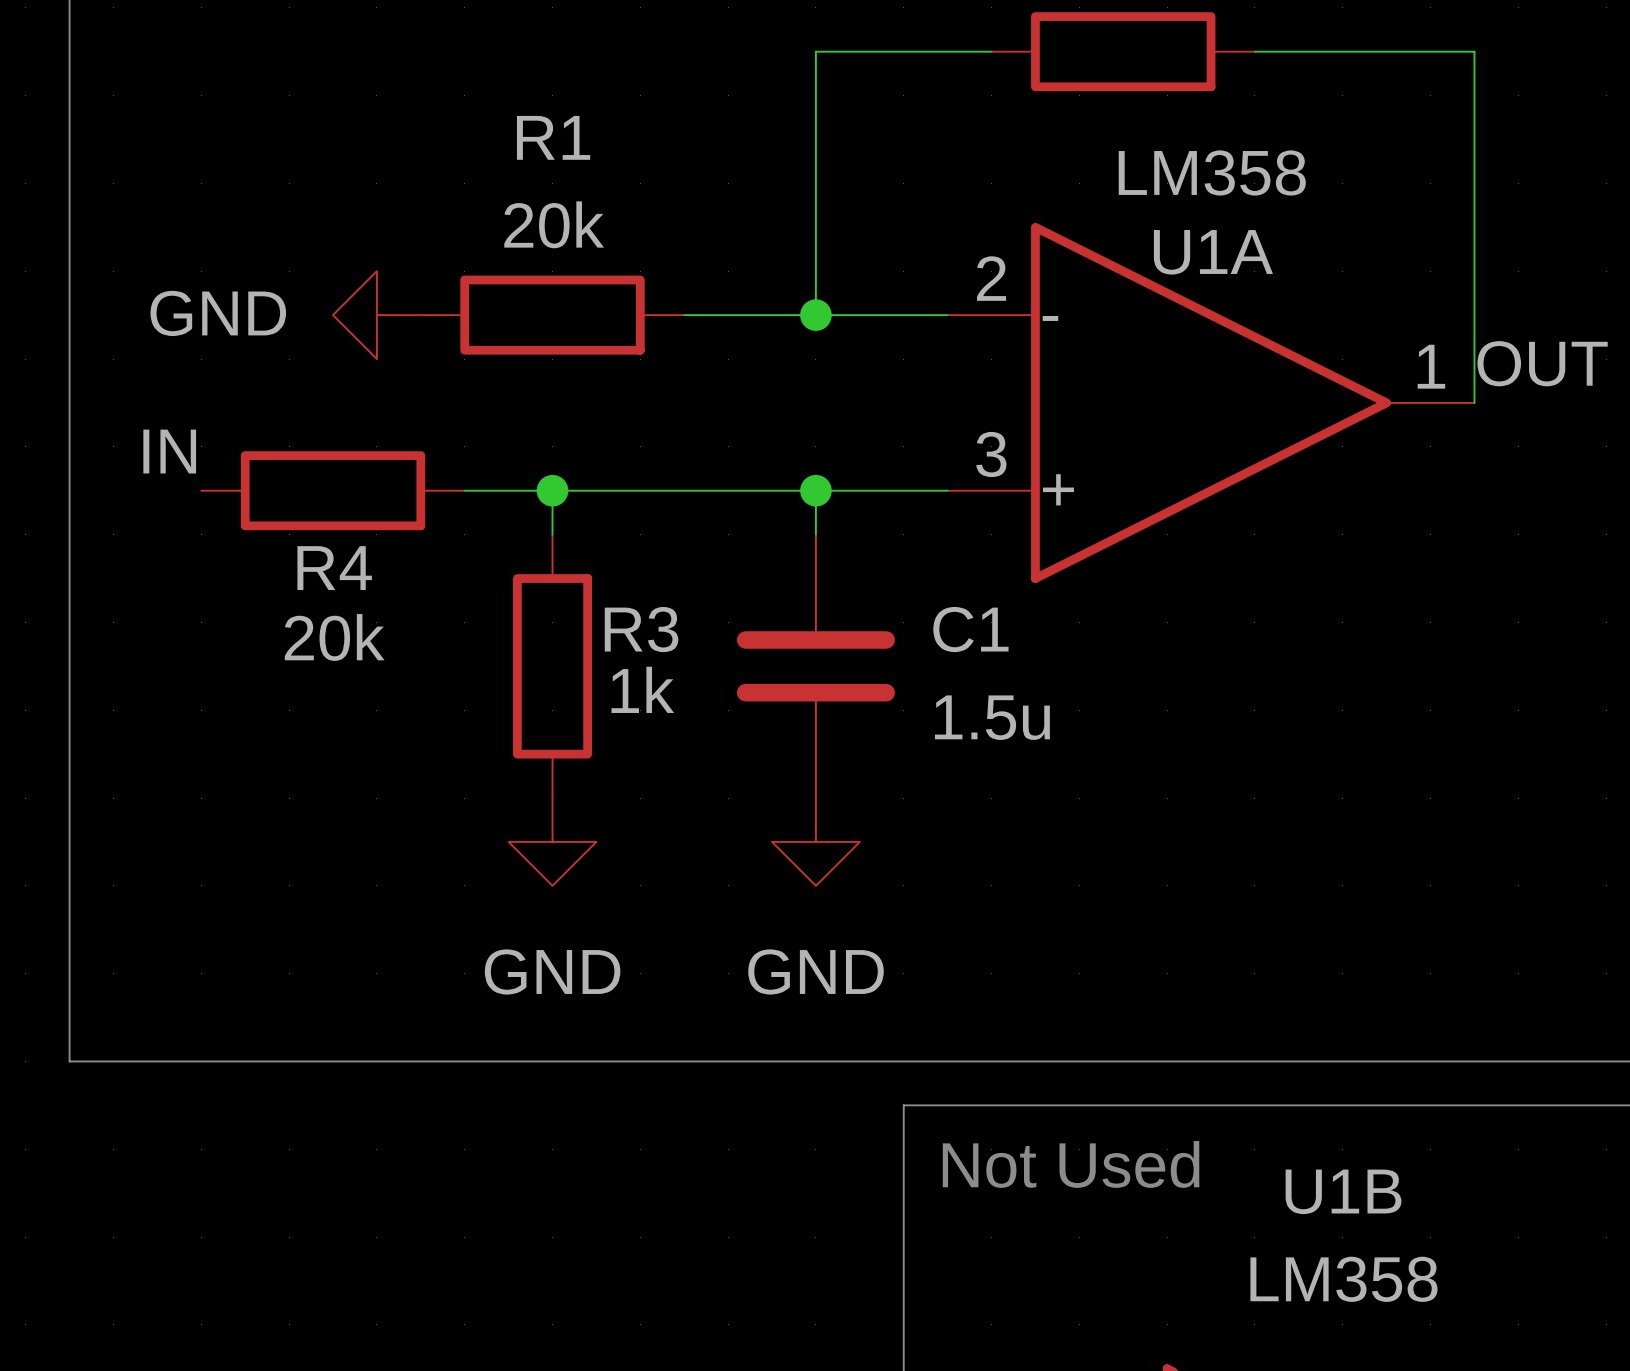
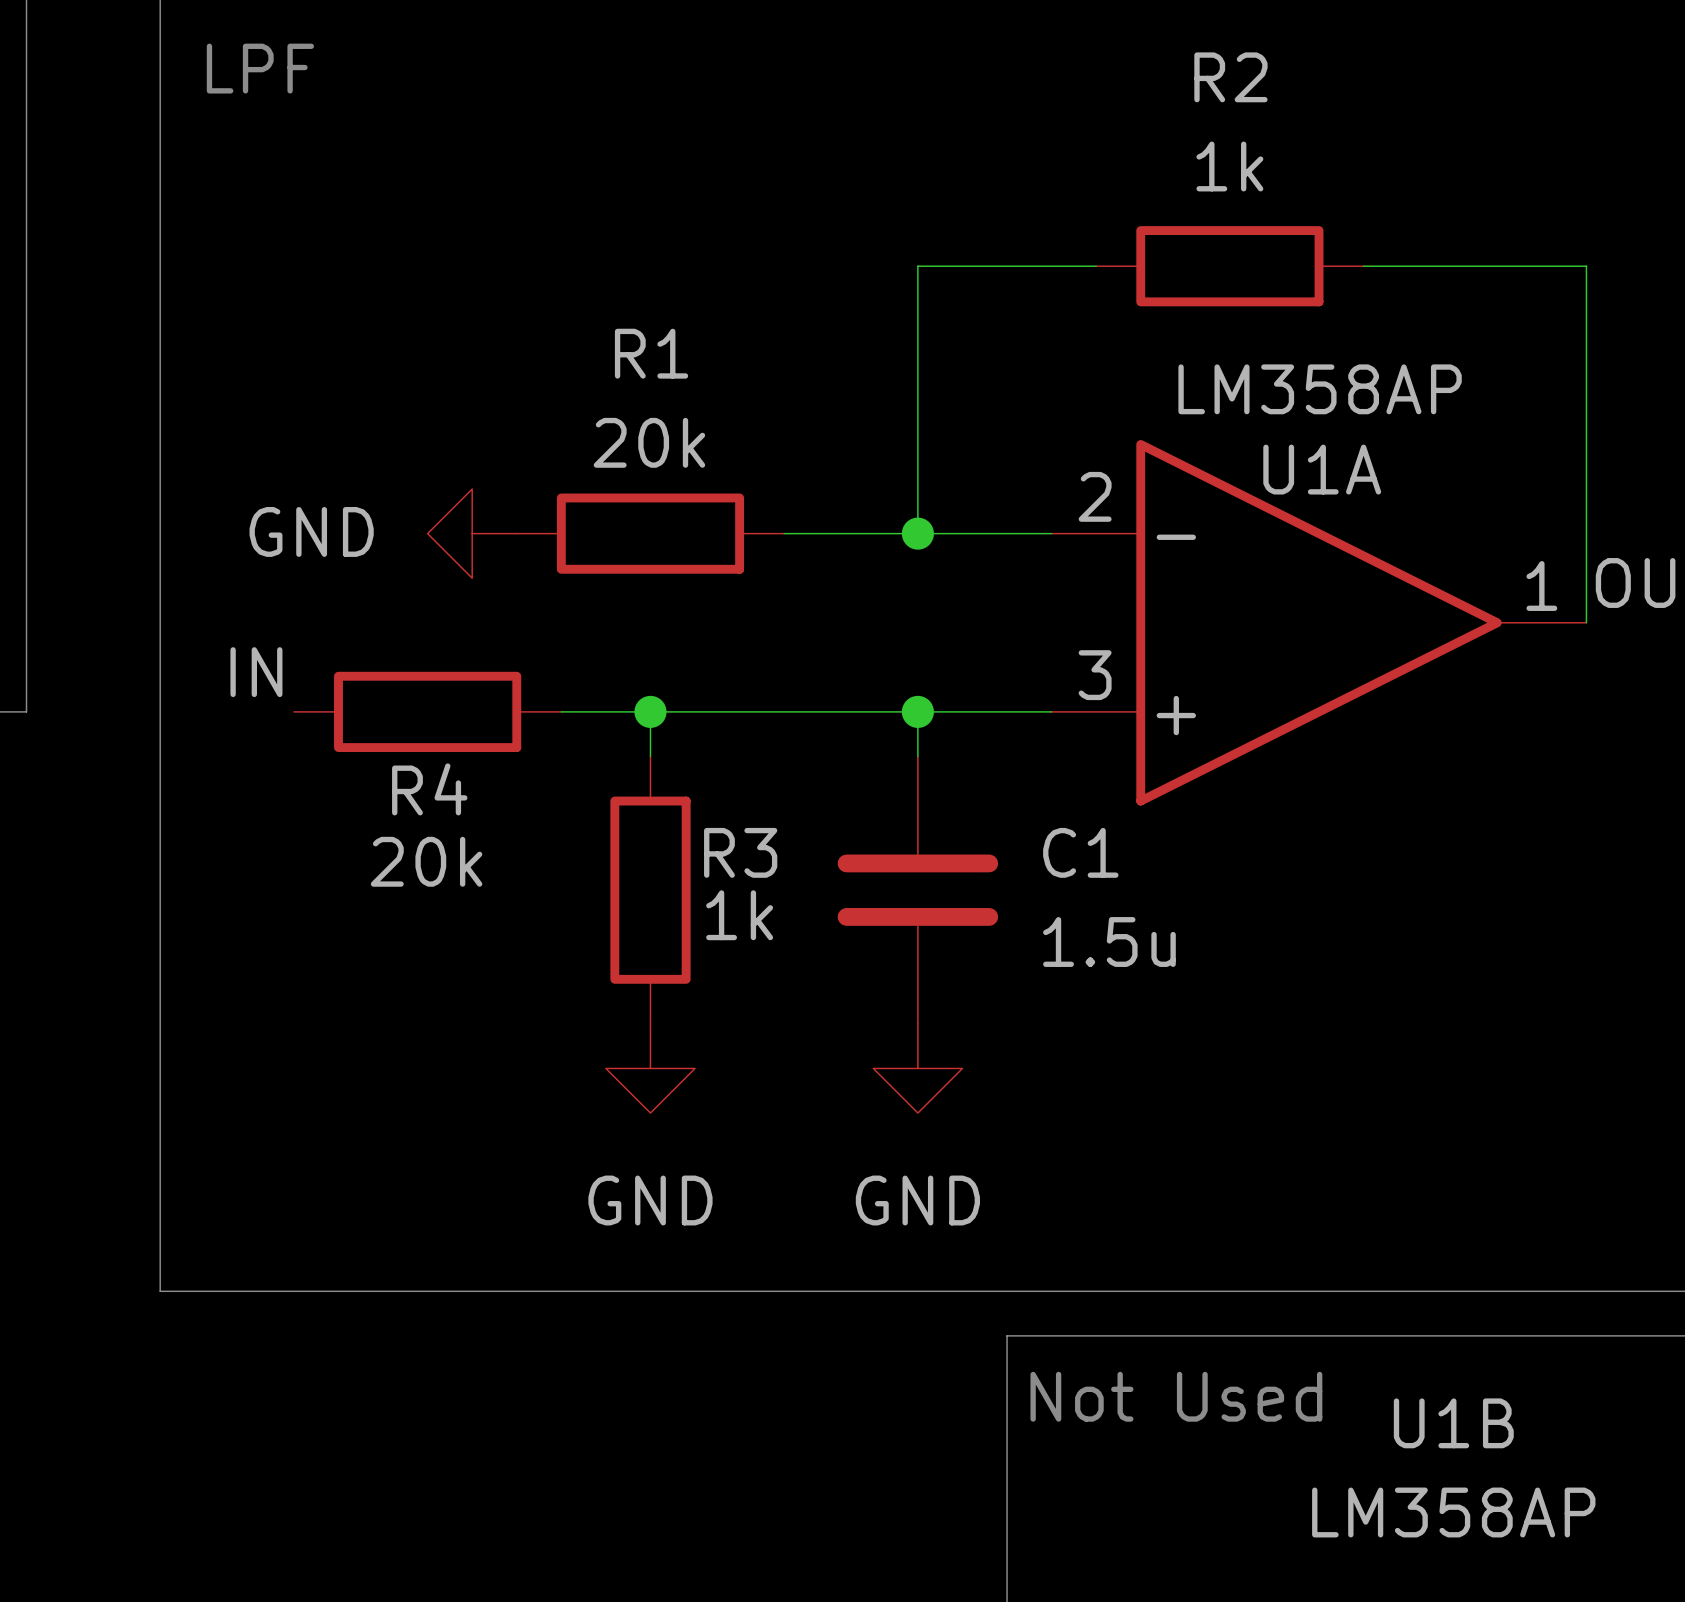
U1A value: LM358 (1212, 172) -> LM358AP (1320, 389)
U1B value: LM358 (1343, 1279) -> LM358AP (1453, 1512)

